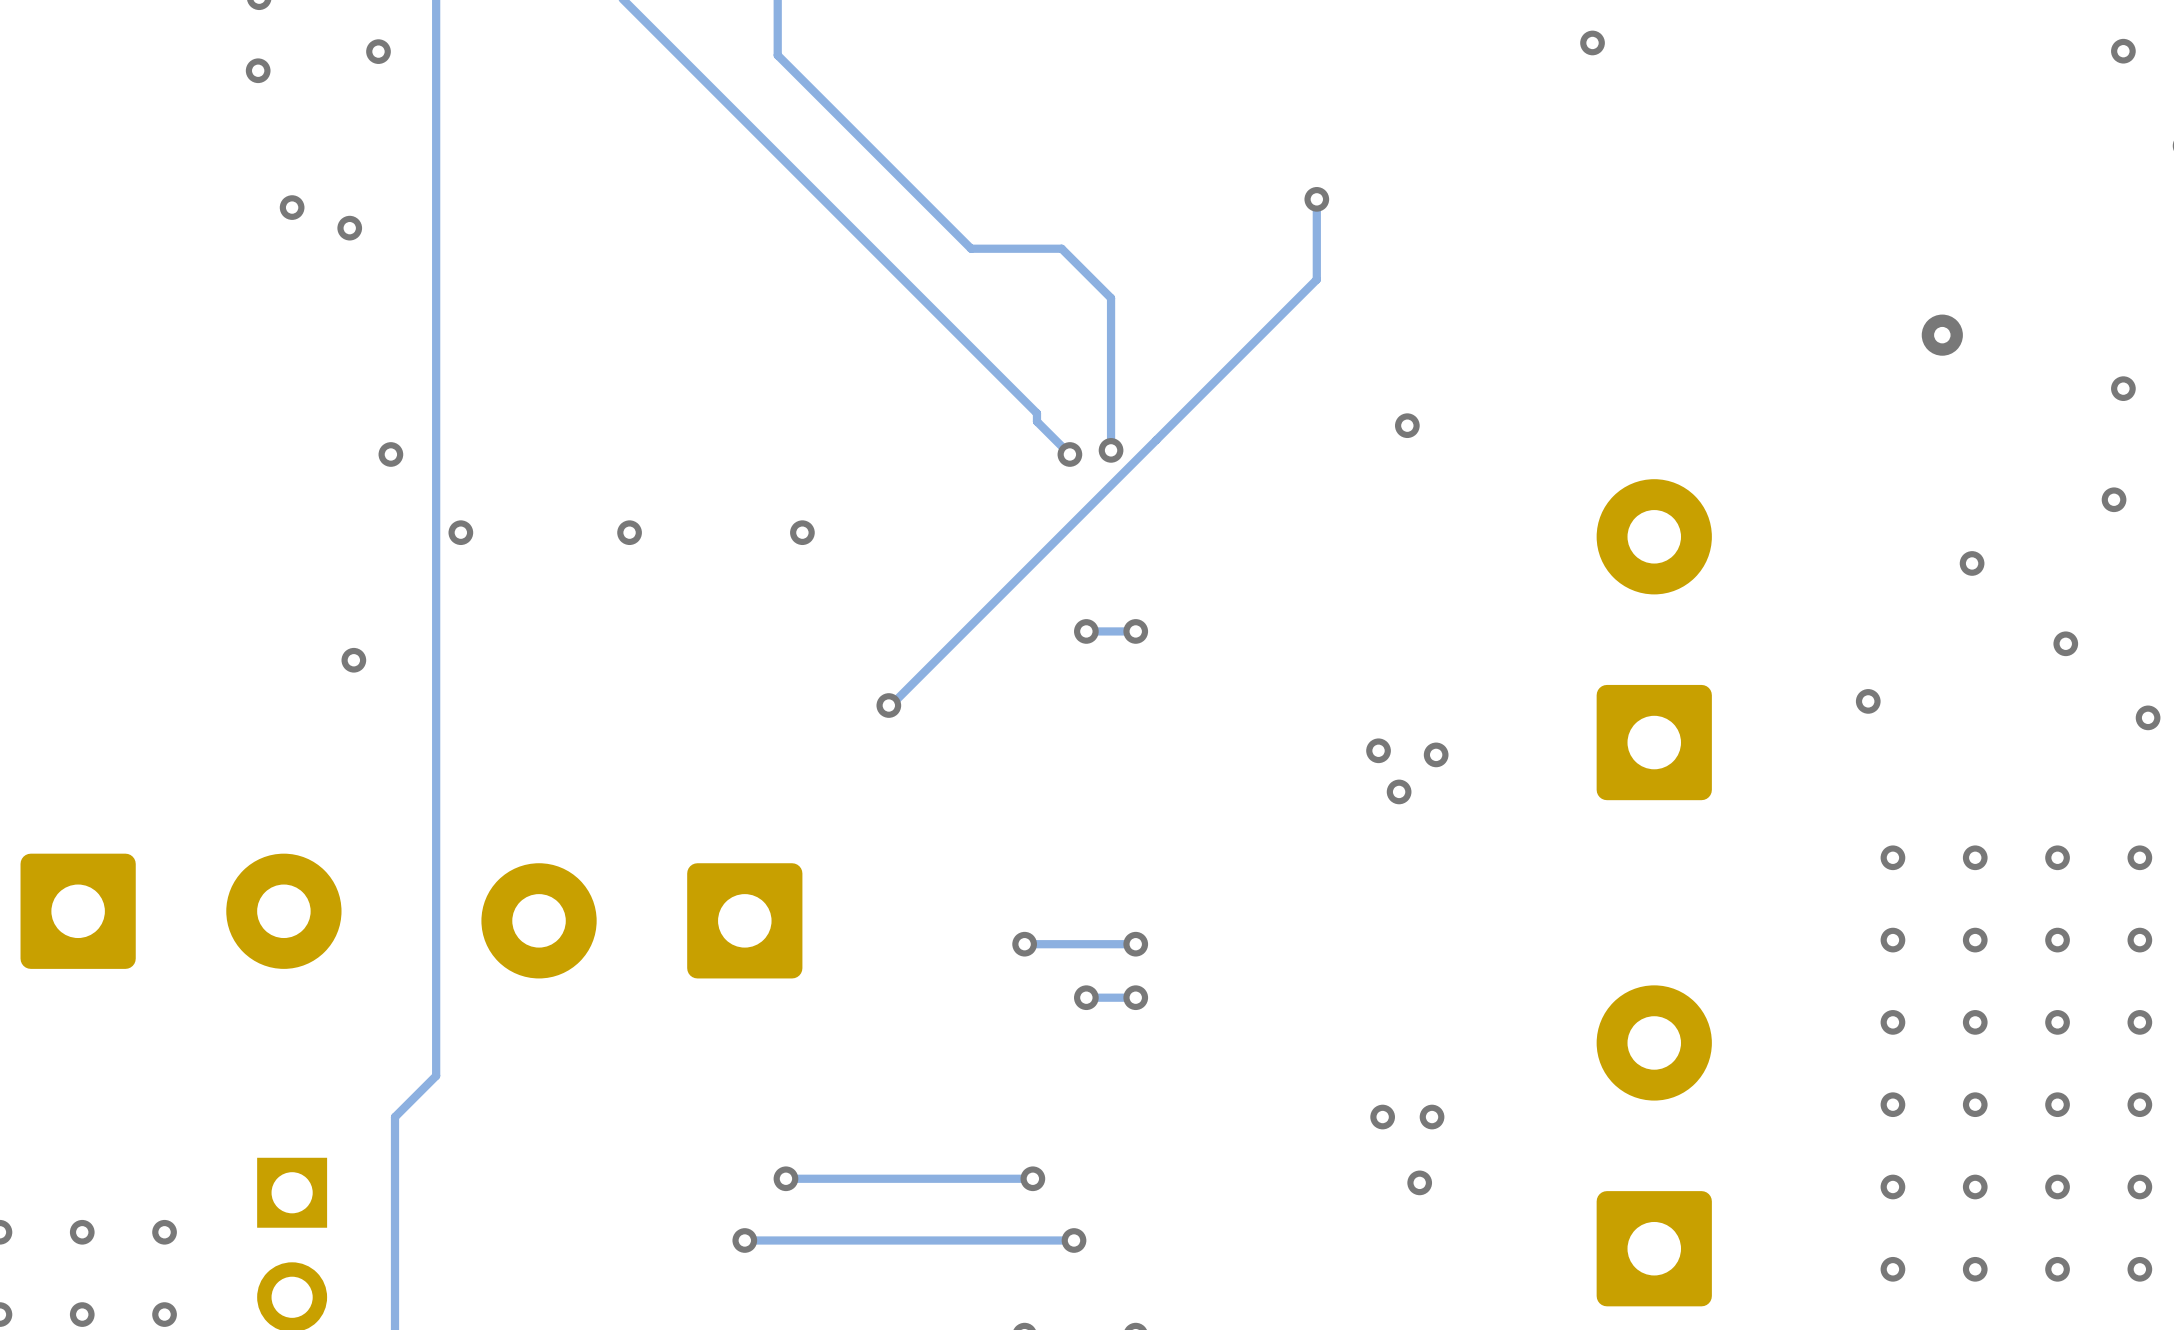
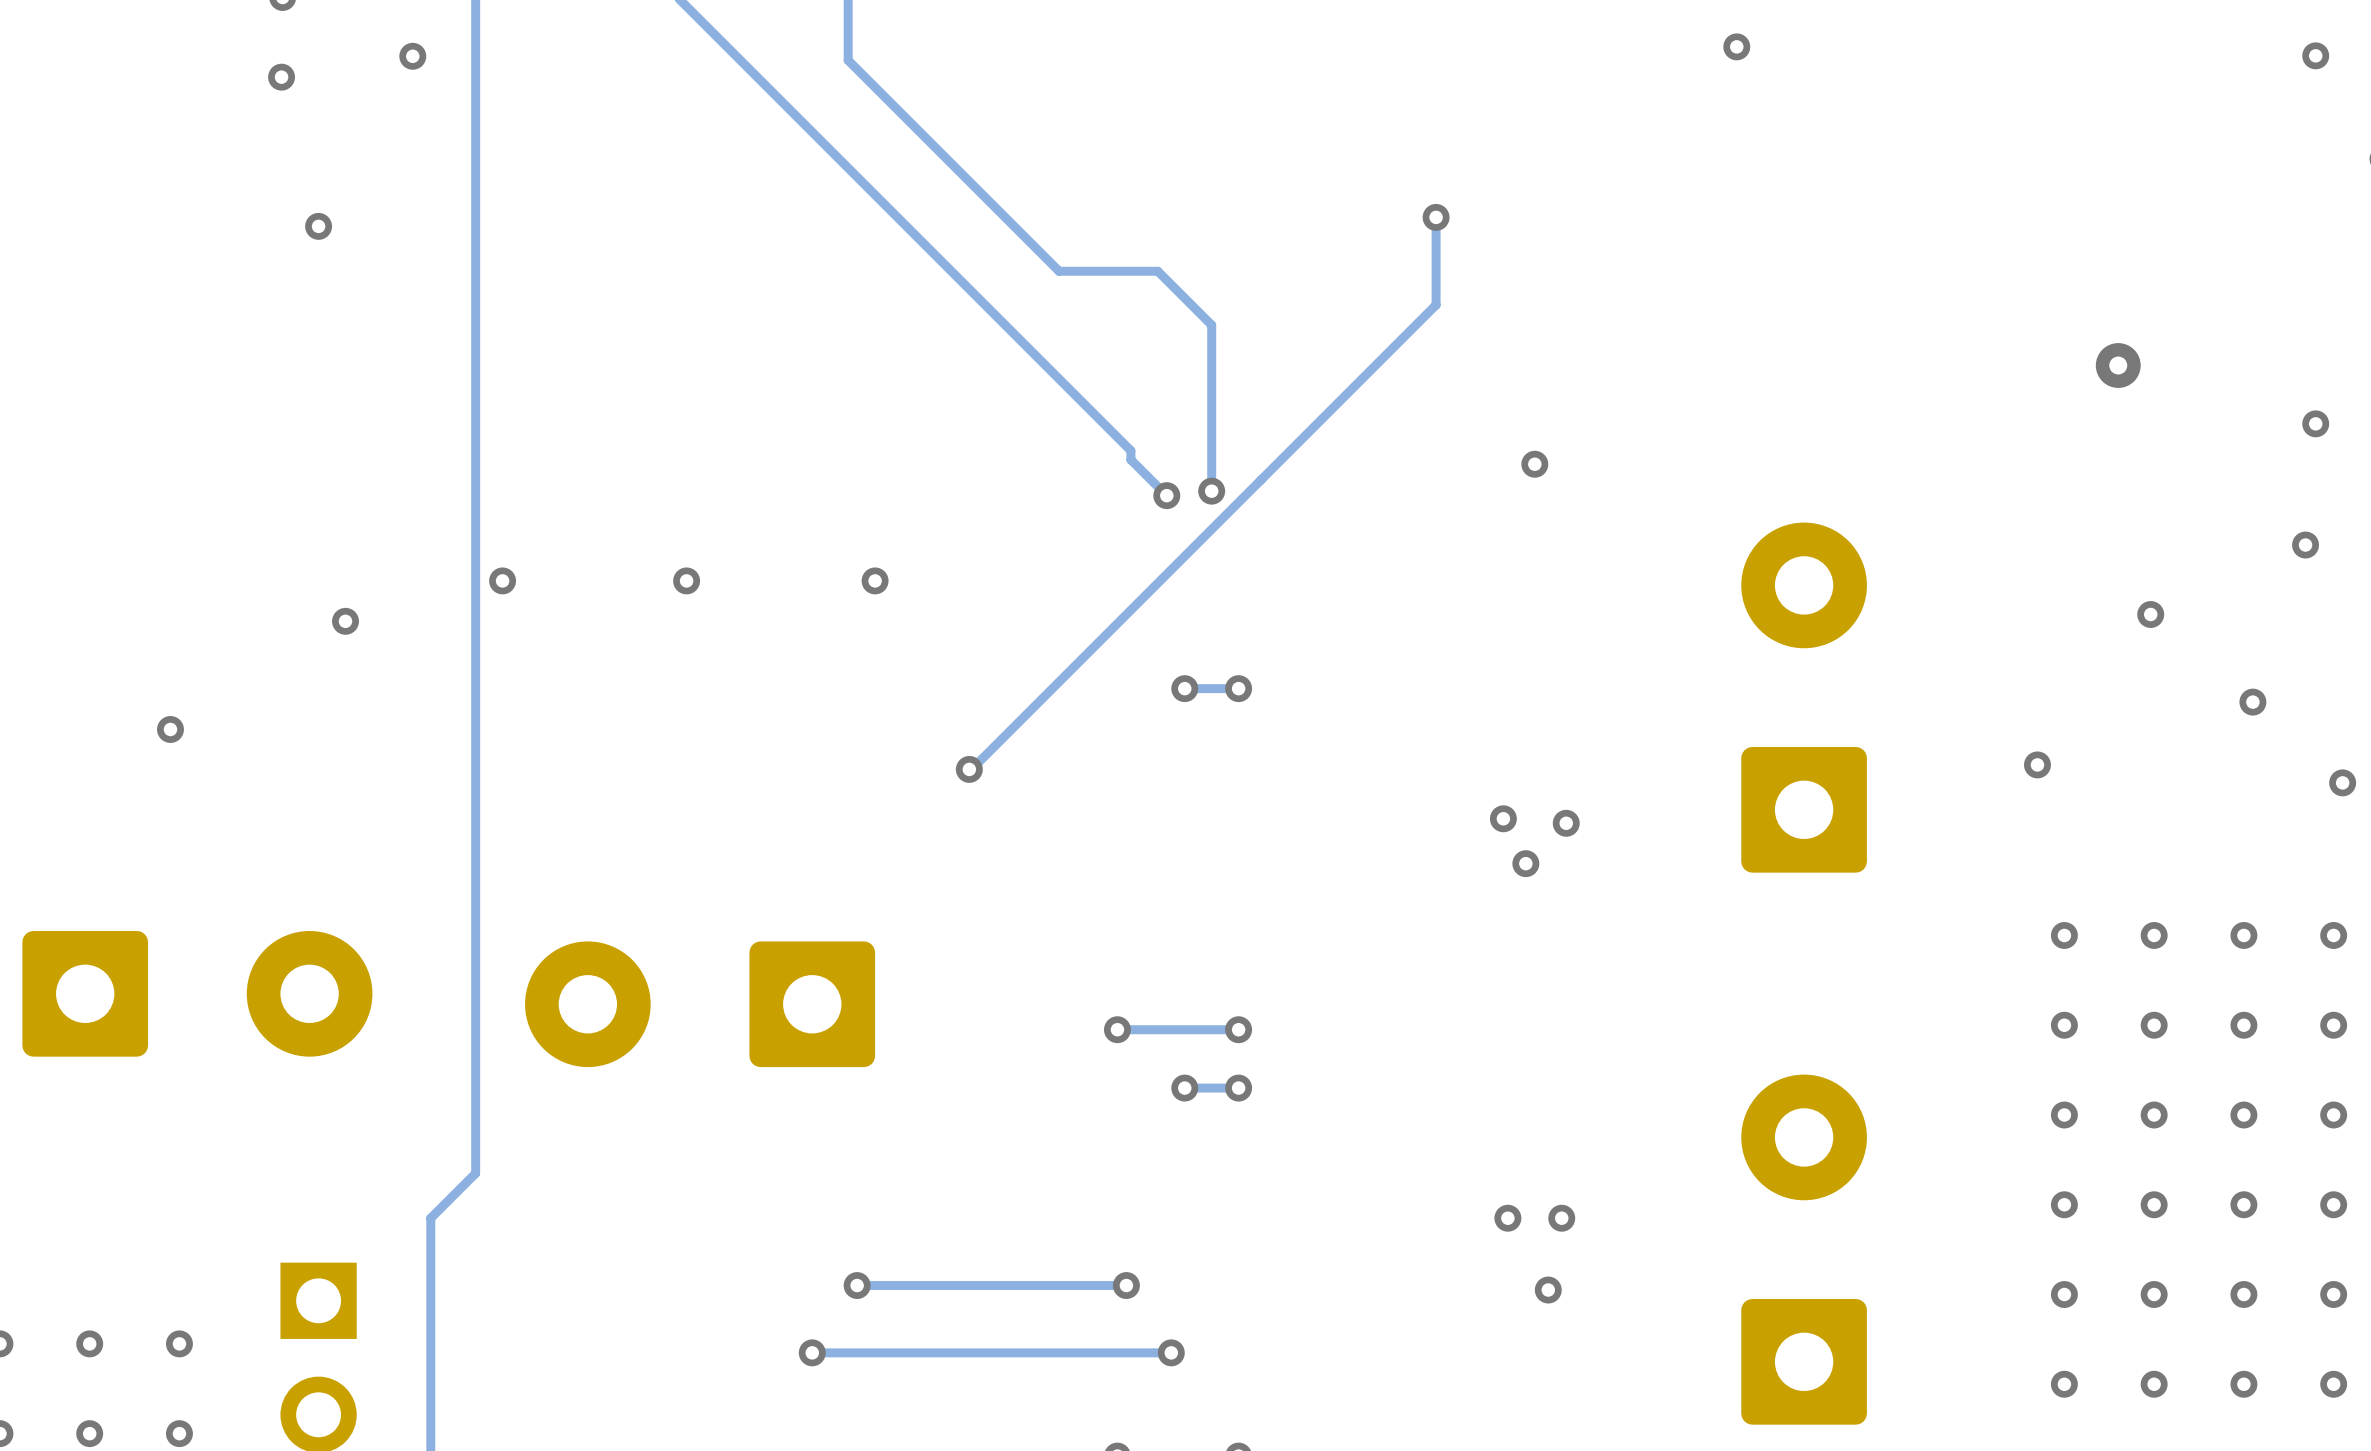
via: (349, 228) -> none
via: (390, 454) -> none
via: none -> (345, 621)
via: (353, 660) -> none
via: none -> (170, 729)

